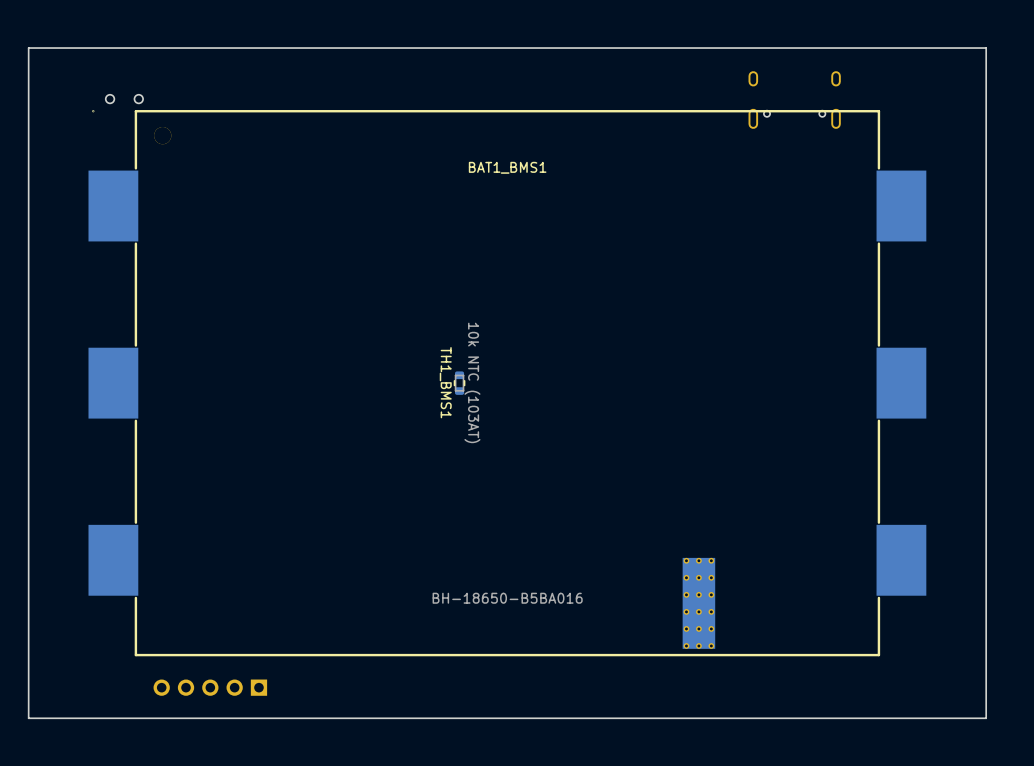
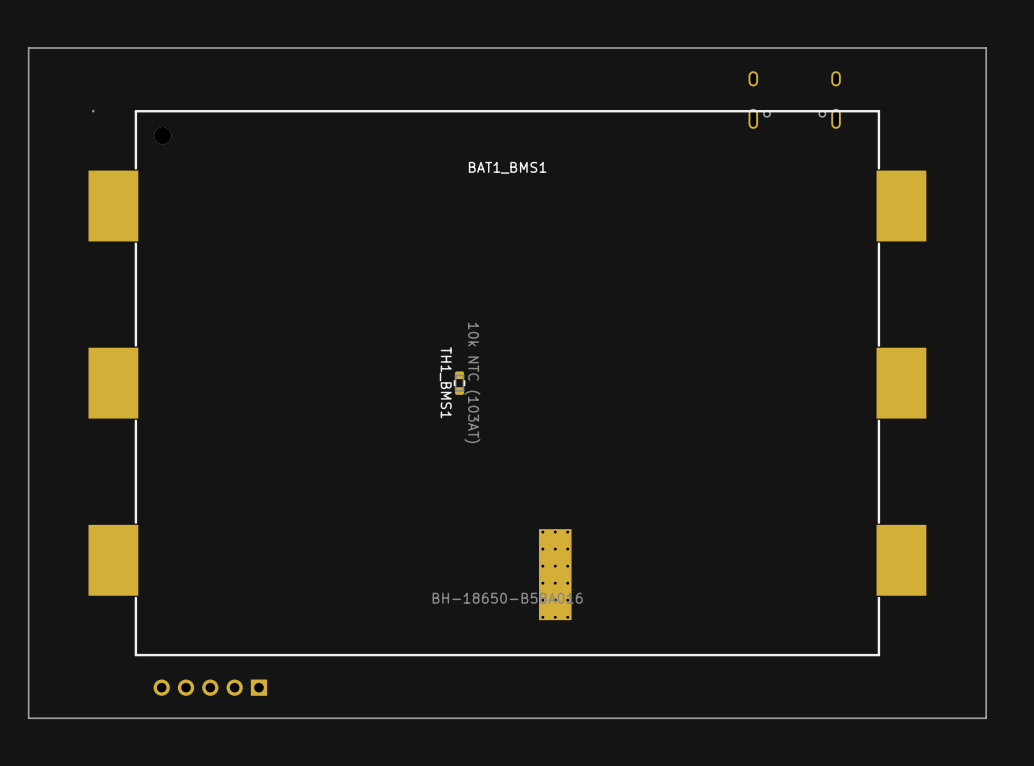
part: (124, 99) -> none
part position: (698, 603) -> (555, 574)

